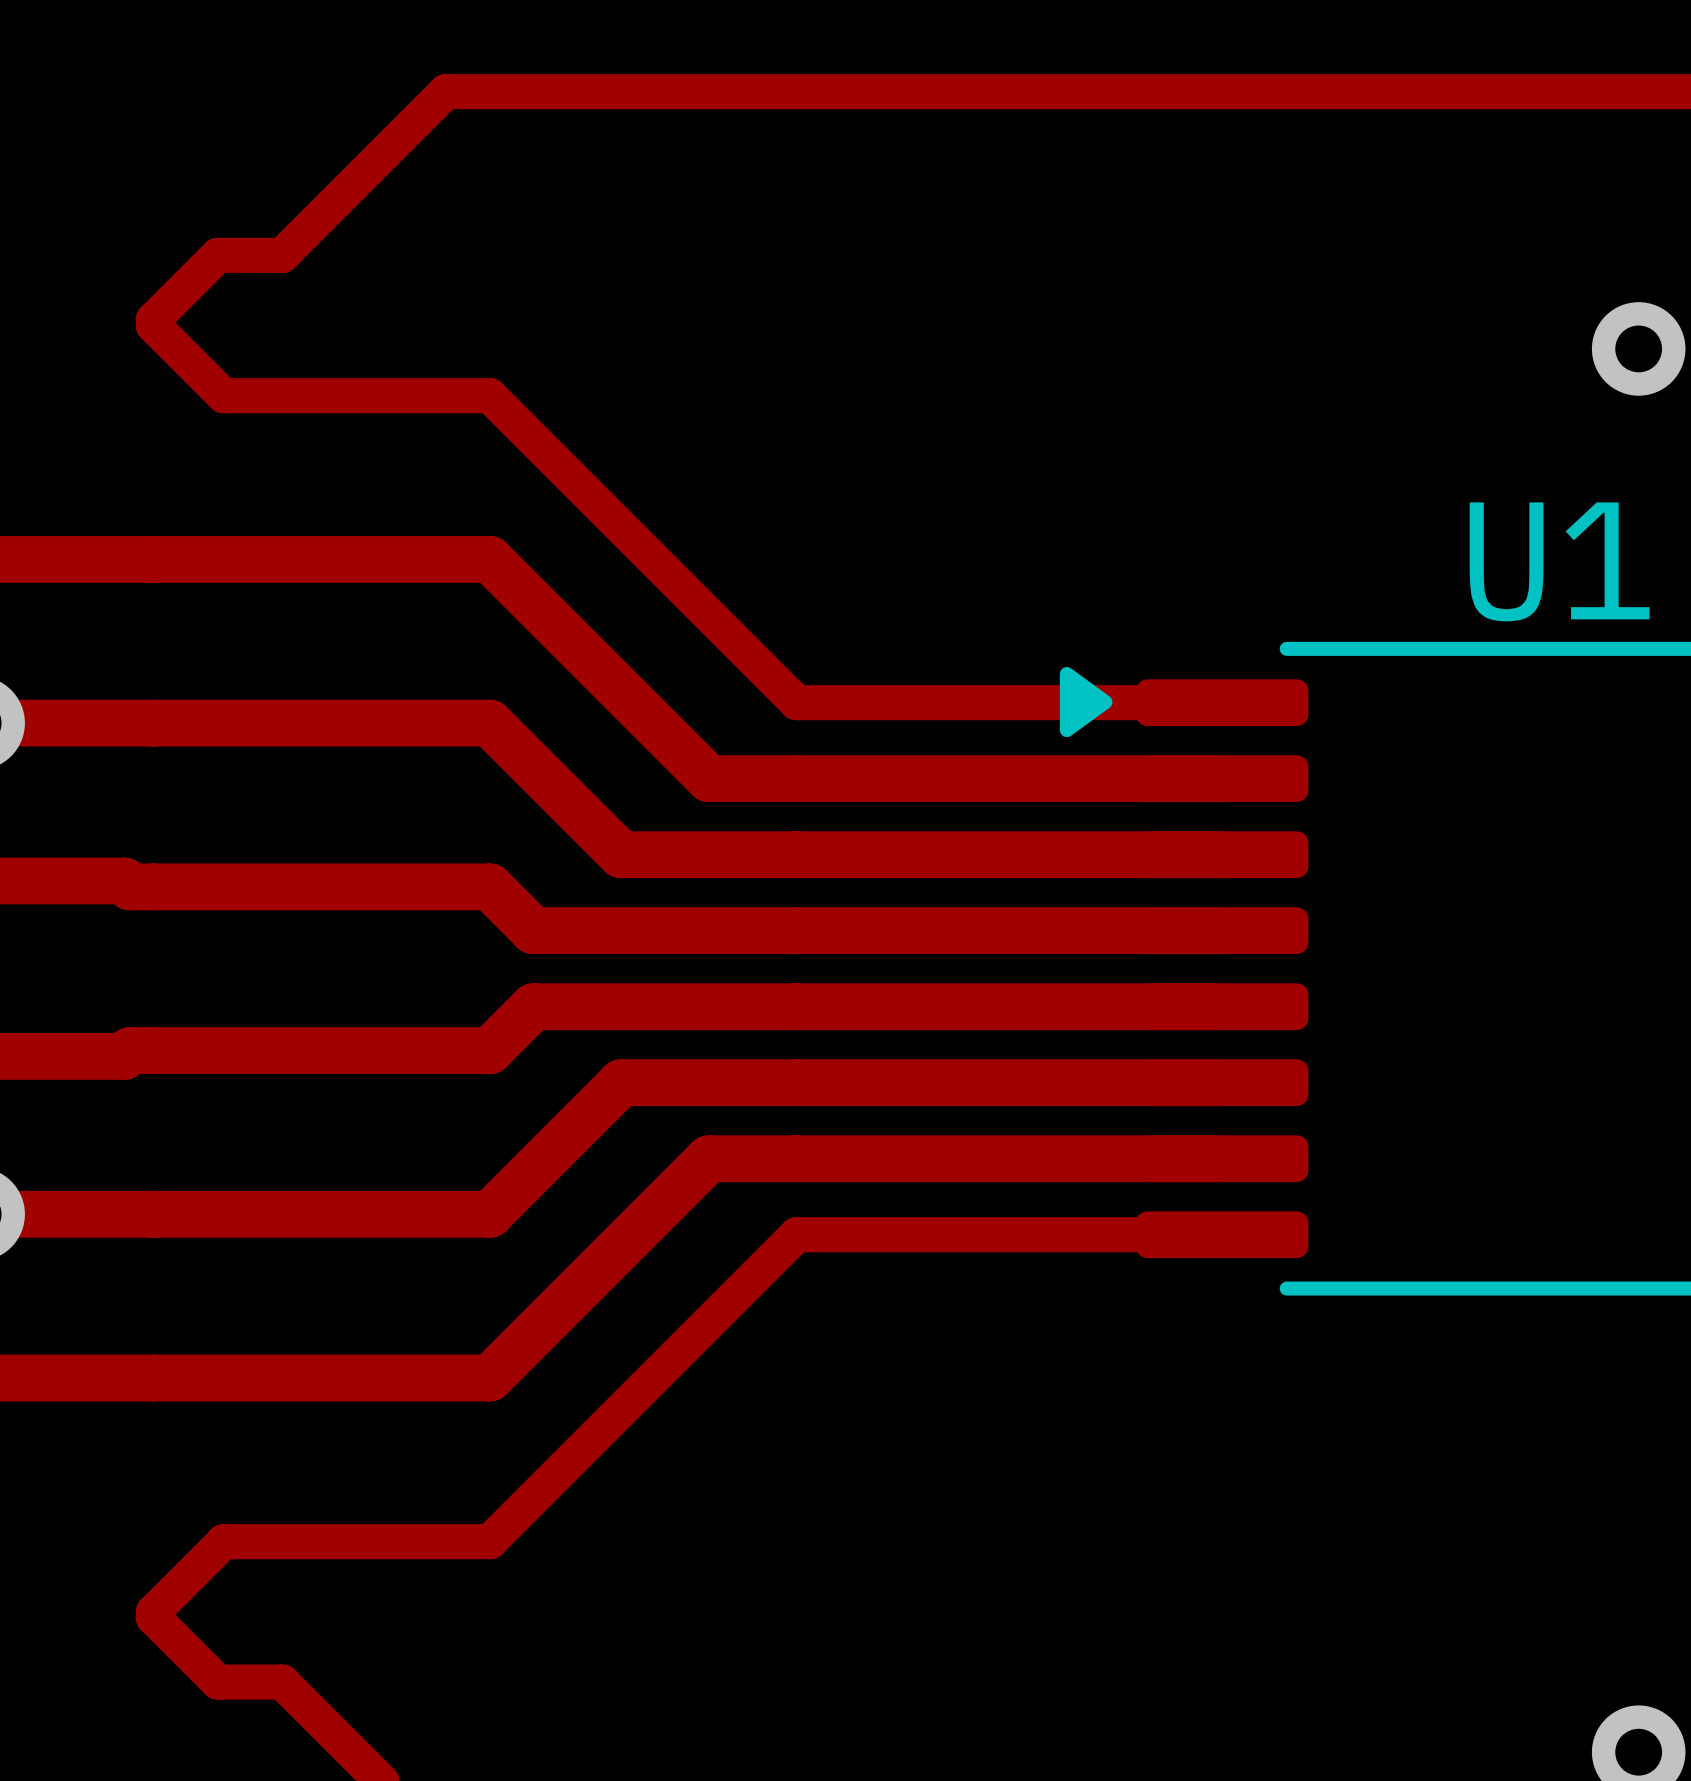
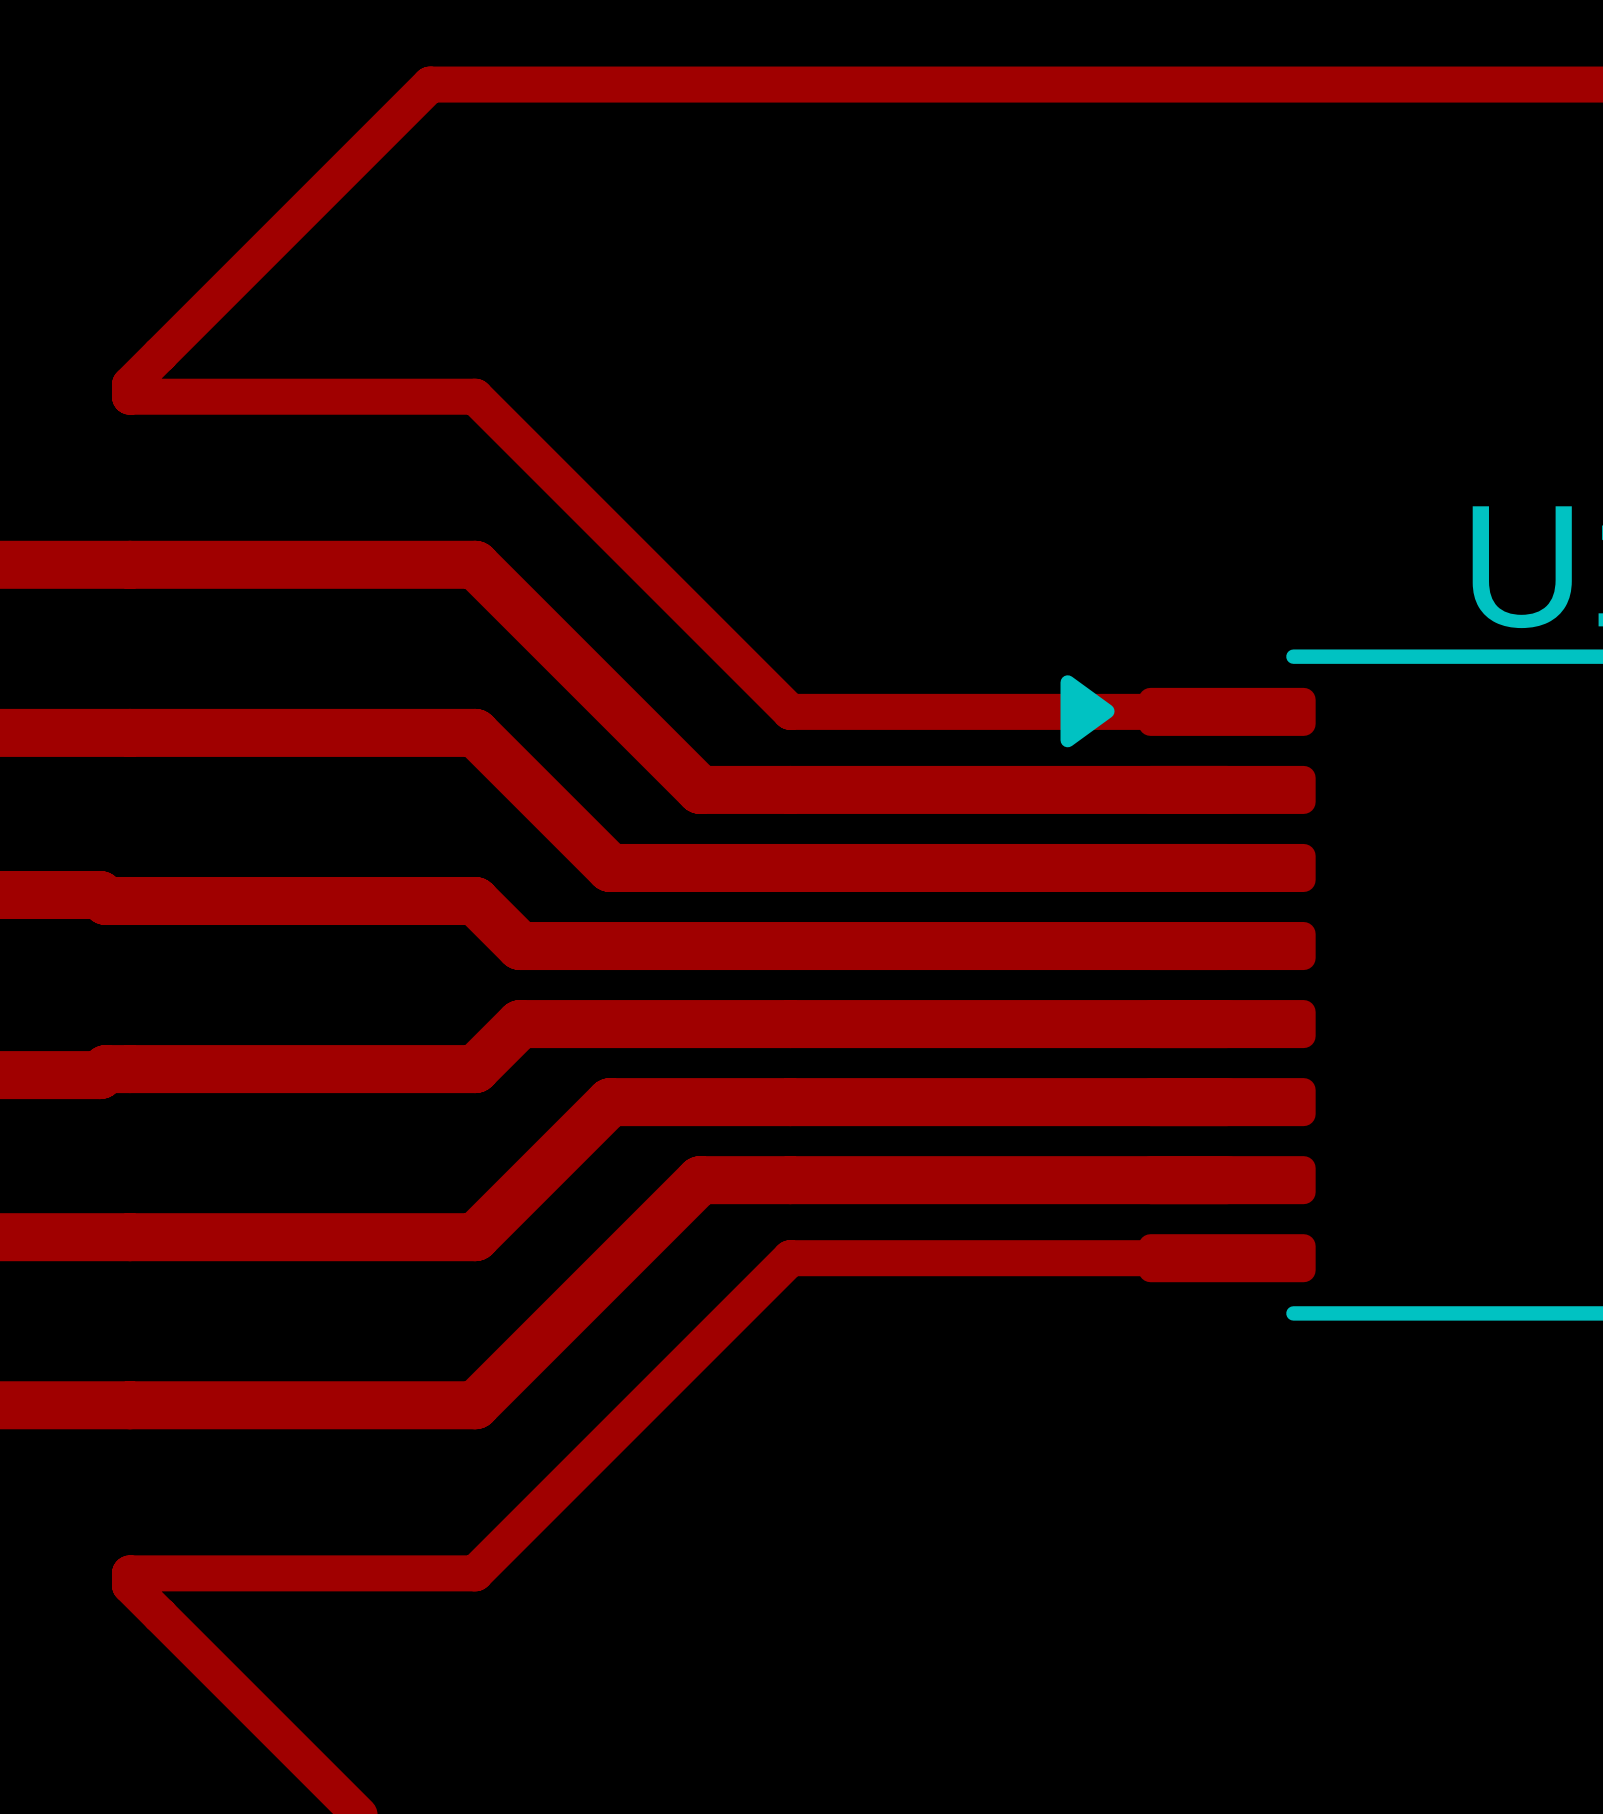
top track: (282, 255) (217, 255) (153, 319) (153, 325) (223, 395) -> (262, 252) (130, 384) (130, 396) (202, 396)
top track: (223, 1541) (153, 1611) (153, 1617) (217, 1682) (282, 1682) -> (202, 1573) (130, 1573) (130, 1585) (262, 1717)

